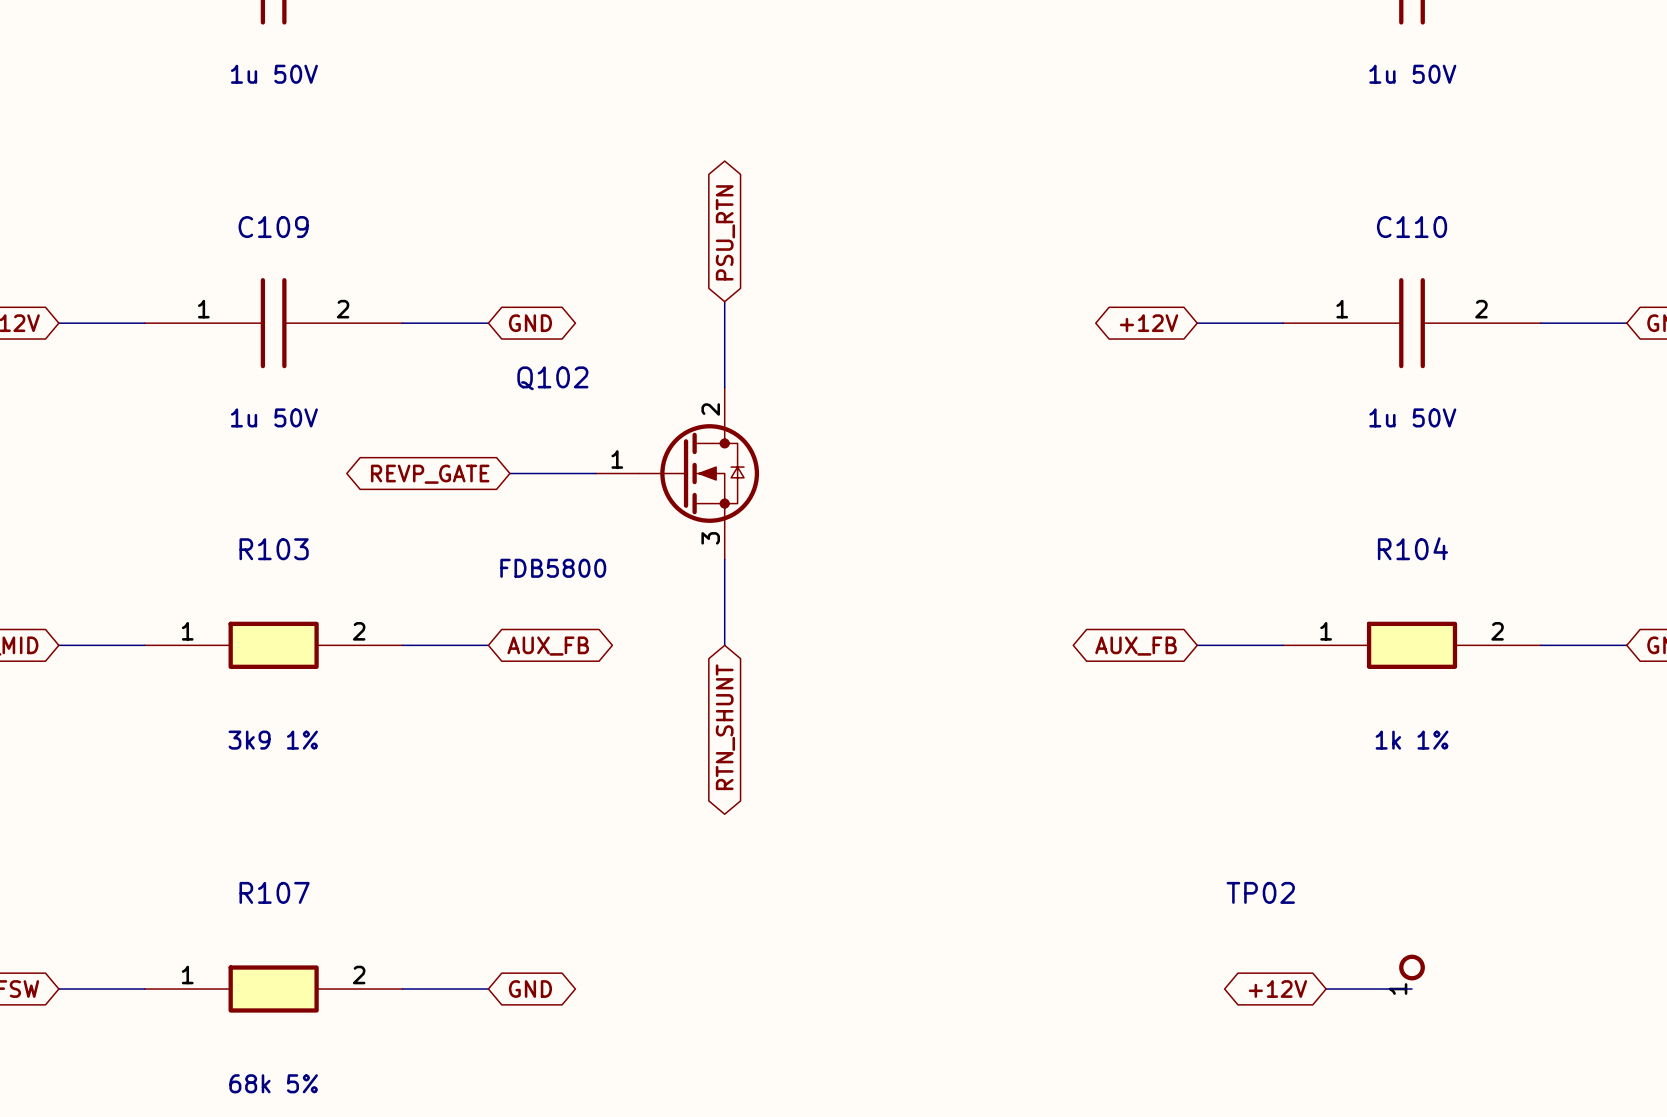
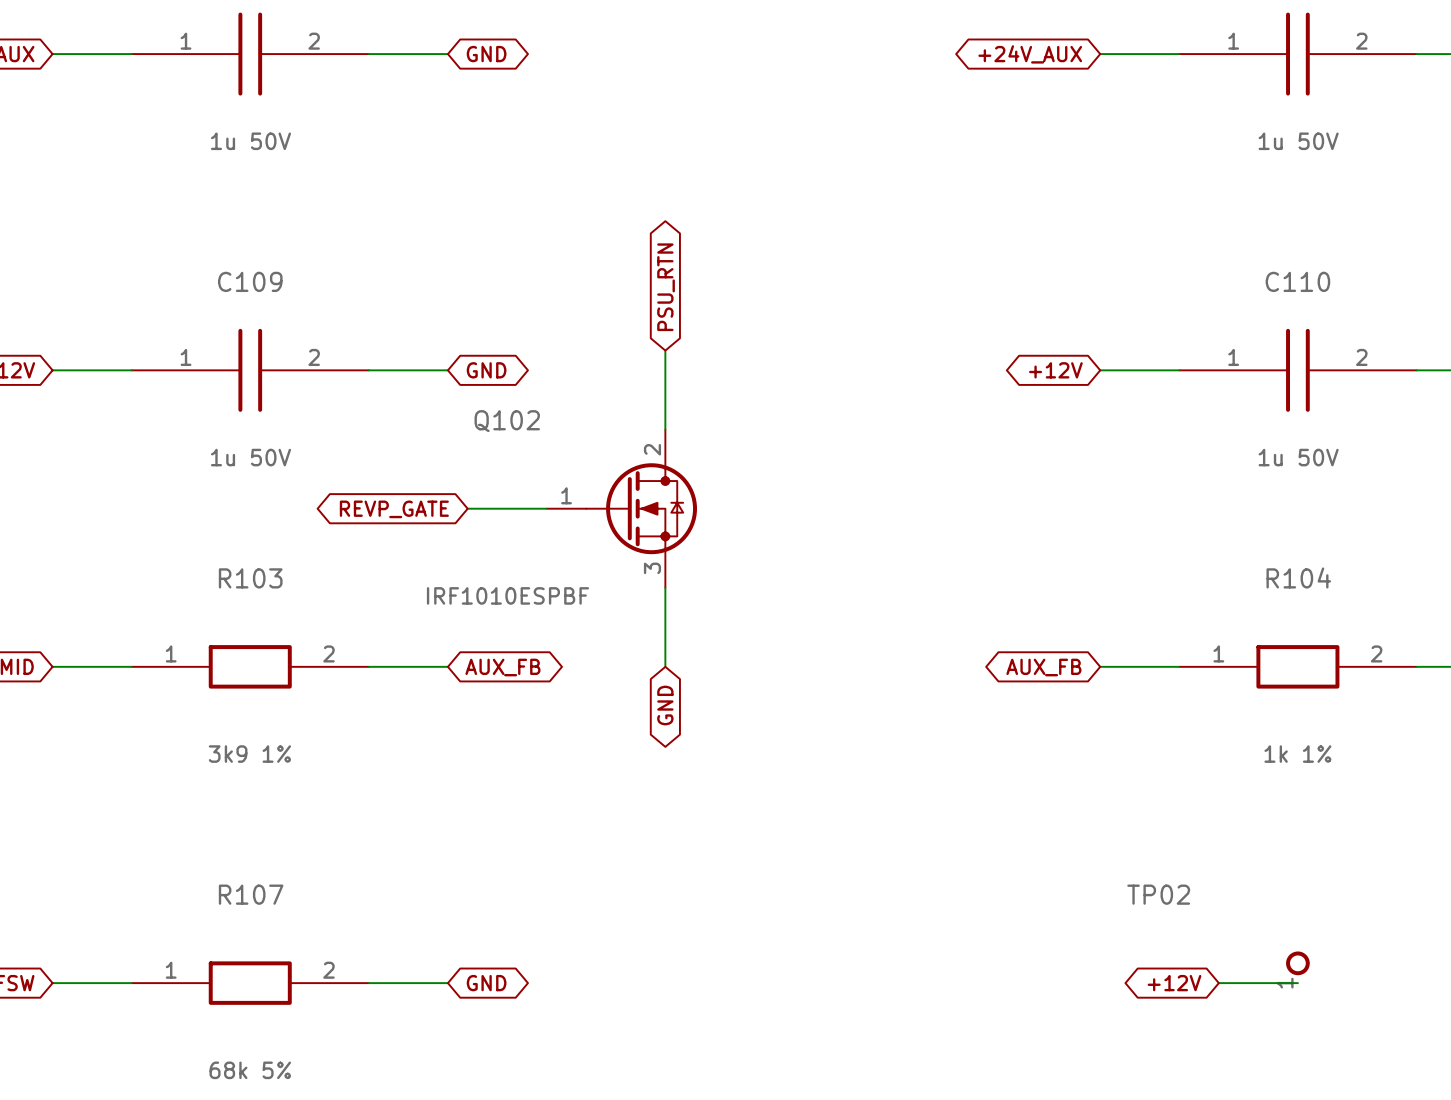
Q102 value: FDB5800 (553, 568) -> IRF1010ESPBF (507, 595)
global label: RTN_SHUNT (725, 727) -> GND (665, 705)

